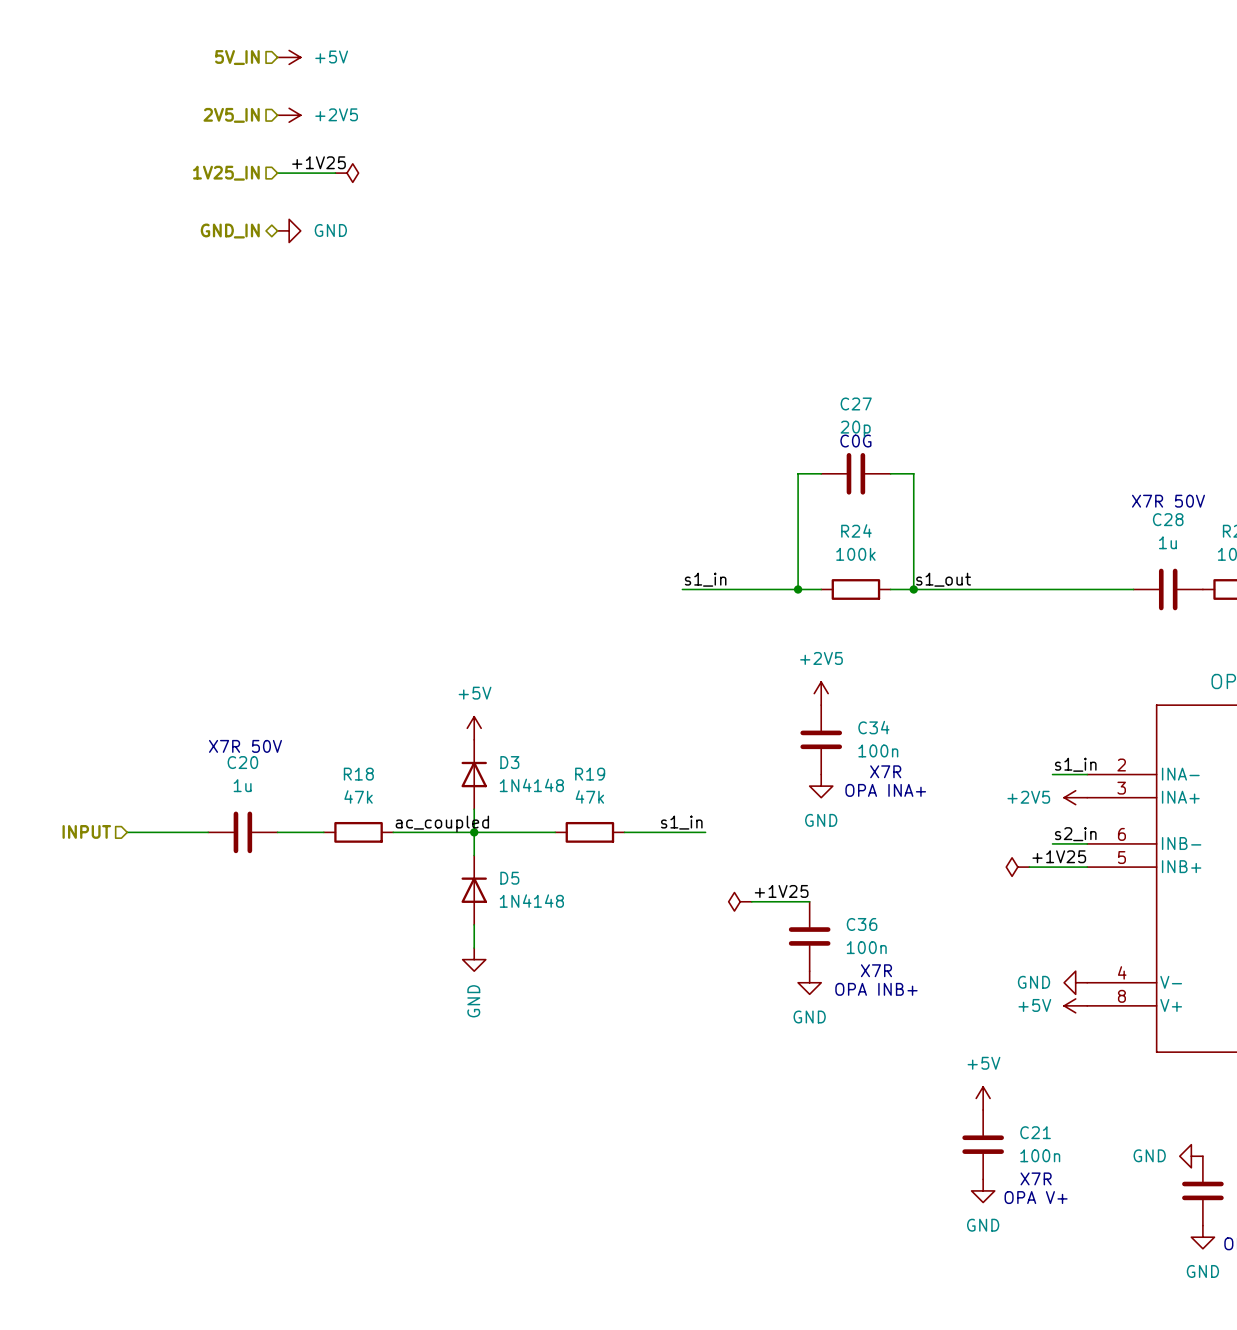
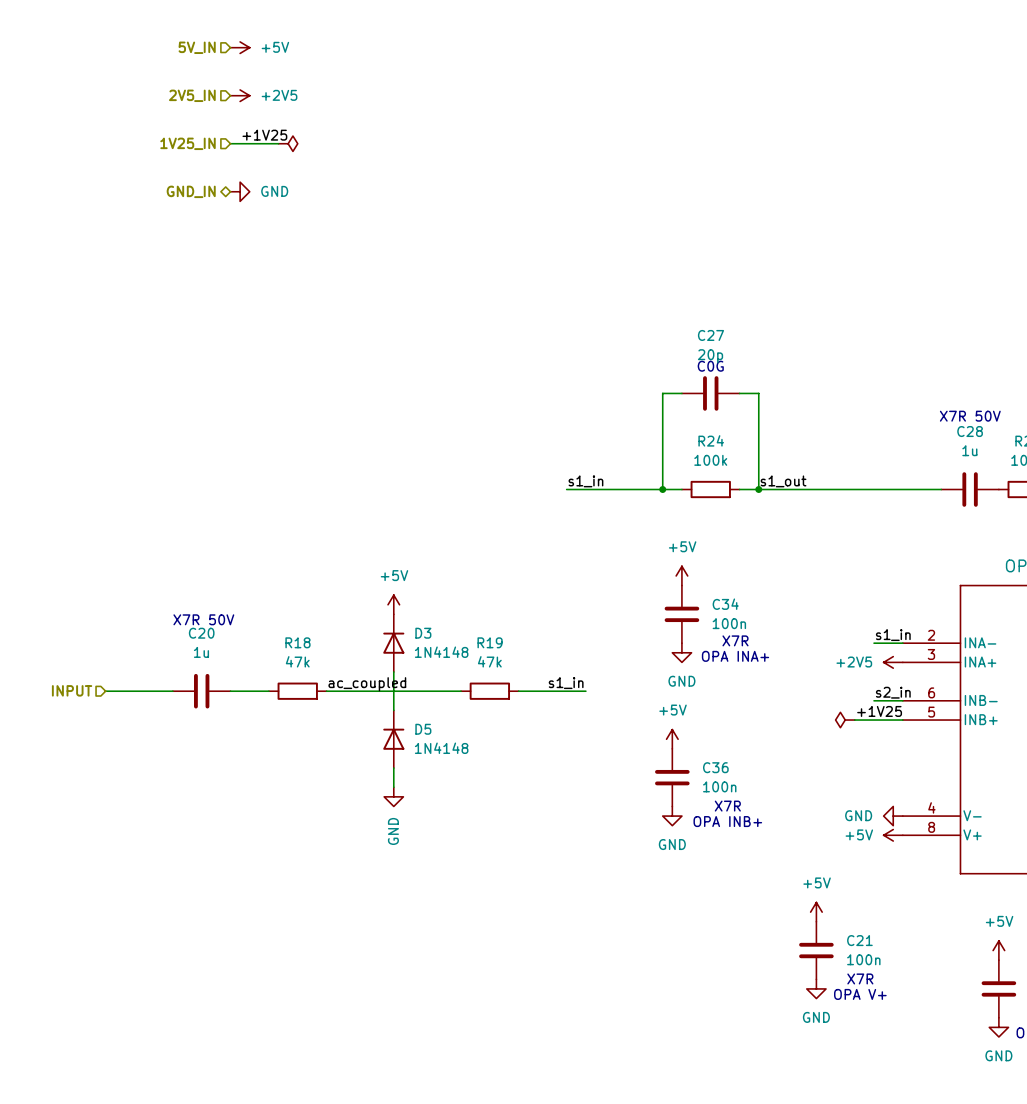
power symbol: +2V5 (821, 693) -> +5V (681, 575)
junction: (474, 832) -> none
power symbol: none -> +5V (672, 739)
label: +1V25 (781, 891) -> none
power symbol: (740, 901) -> none
wire: (751, 901) (809, 901) -> none
power symbol: none -> +5V (998, 950)
power symbol: GND (1191, 1156) -> none

